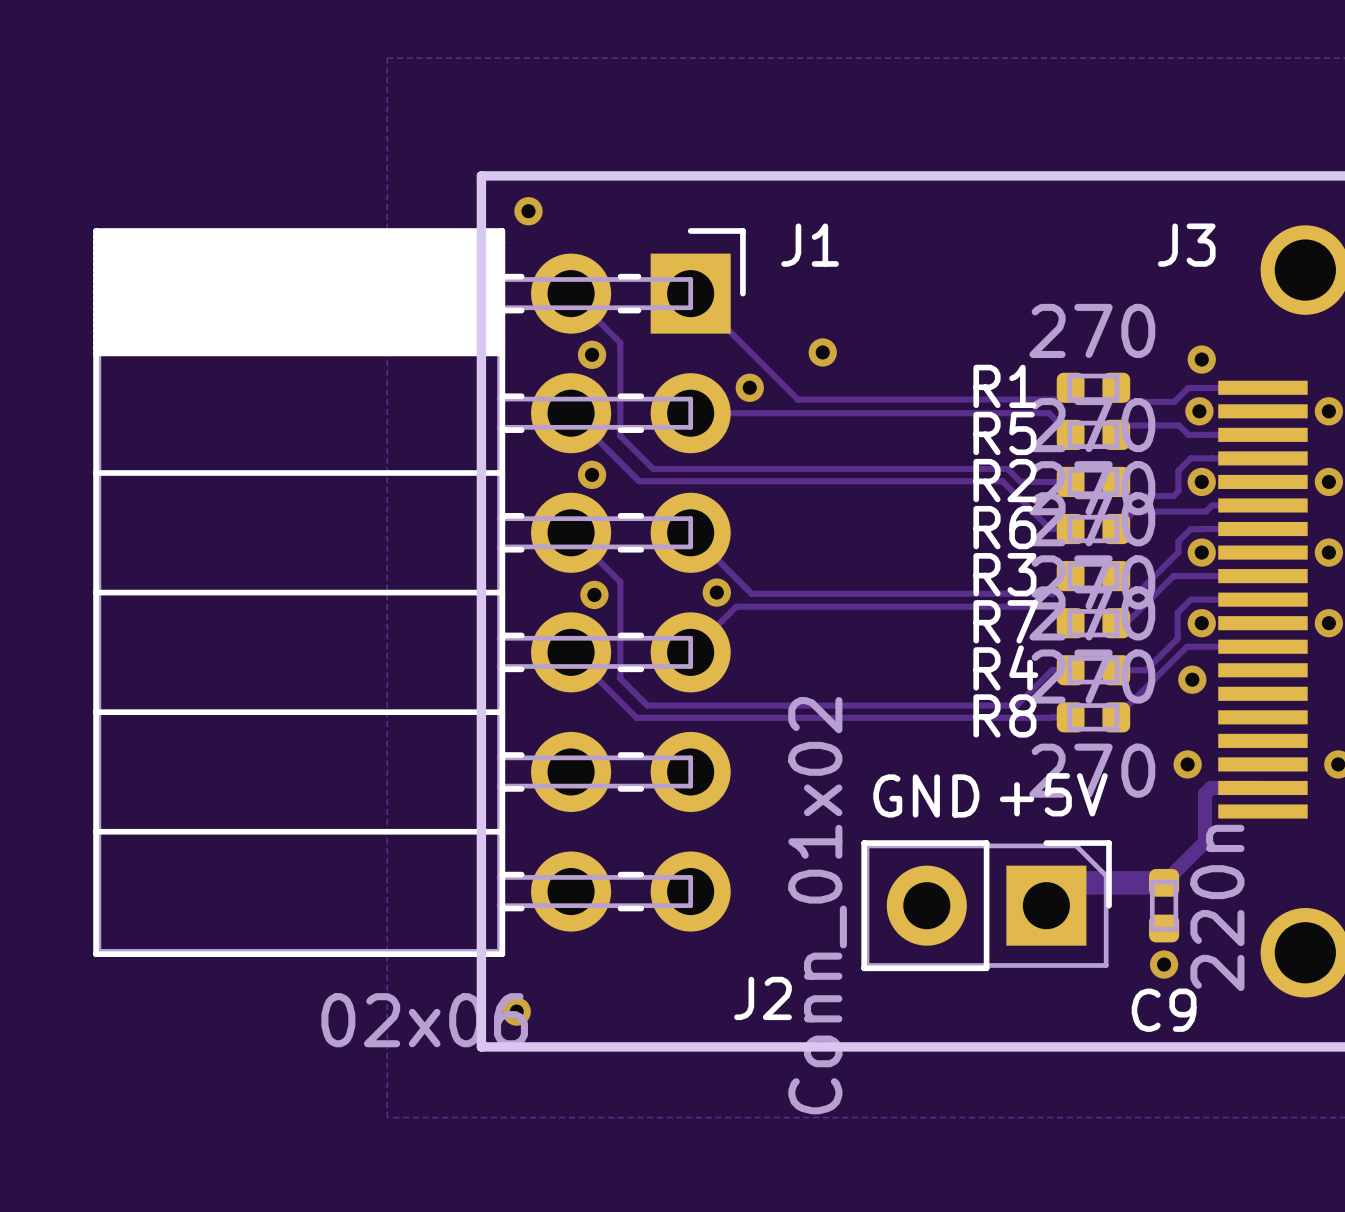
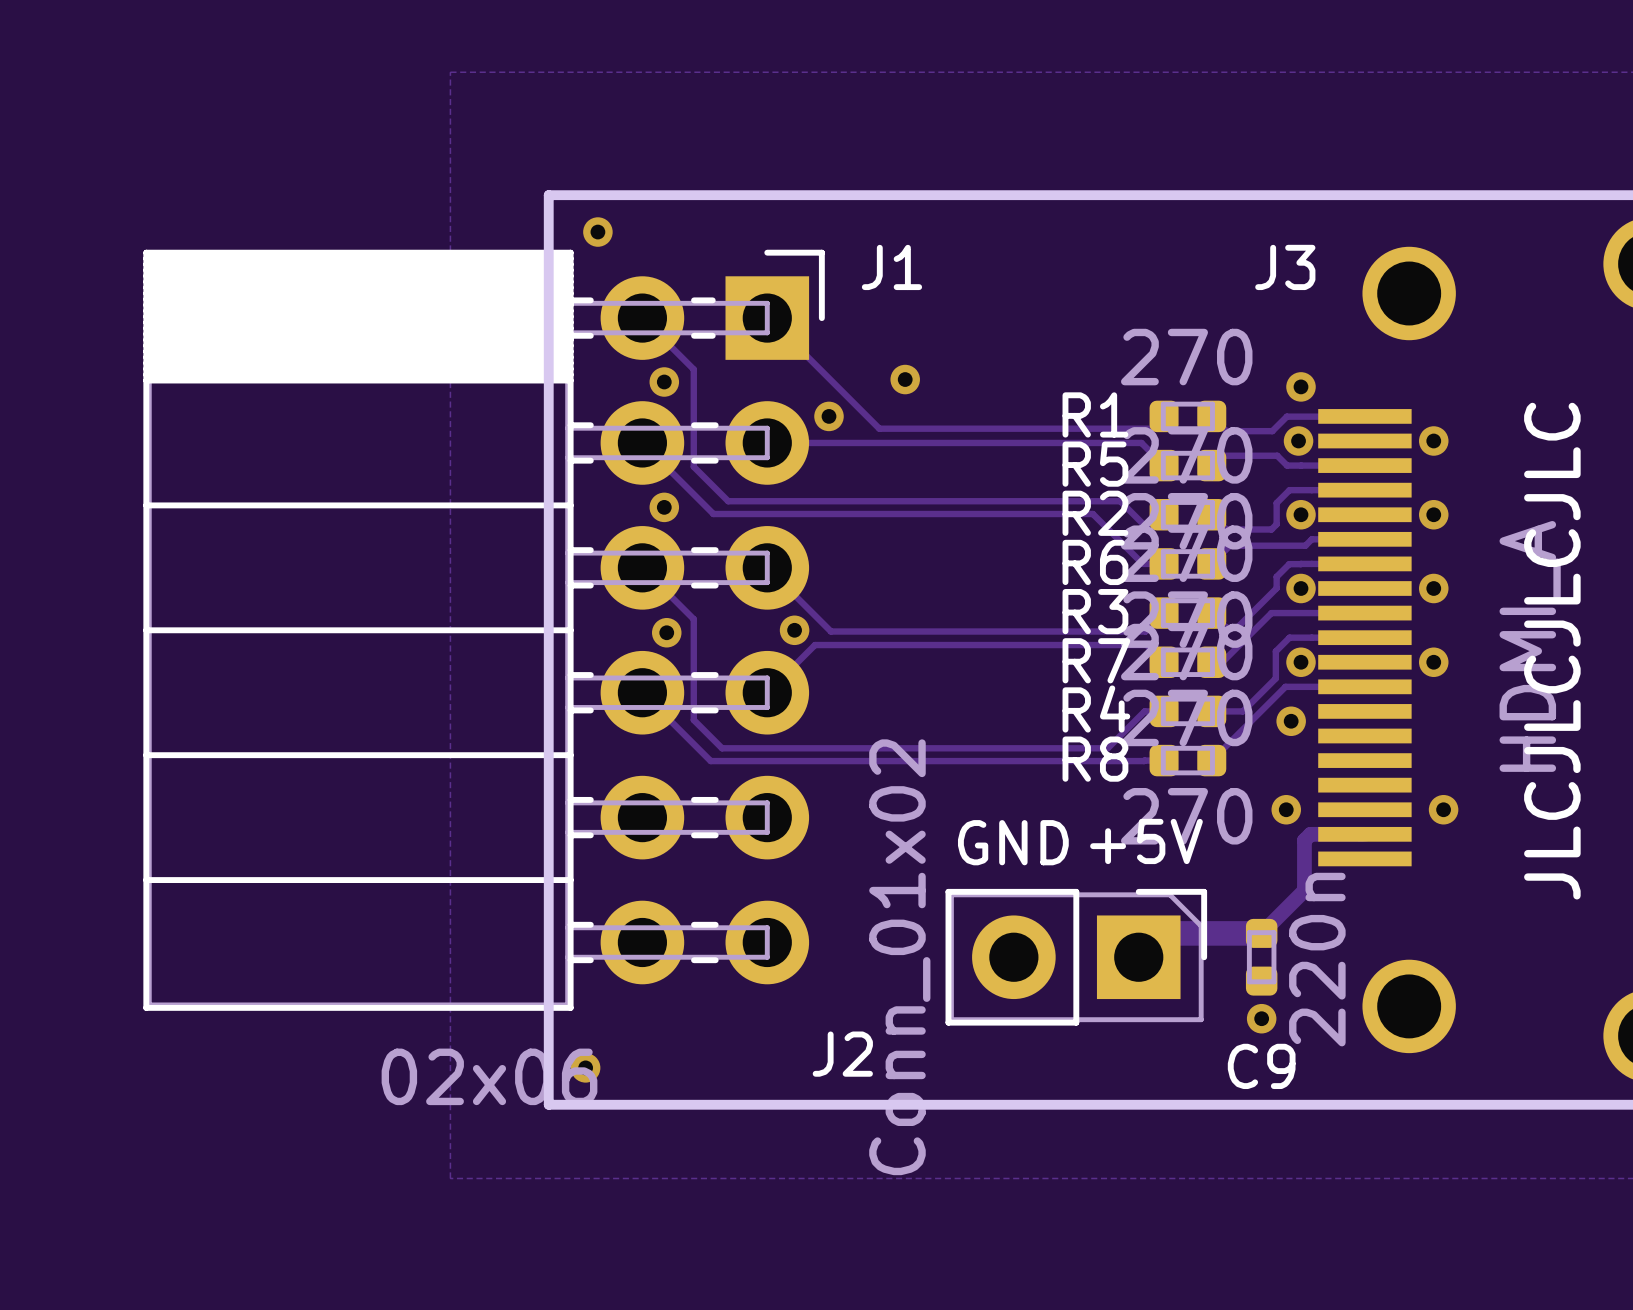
track: (1007, 468) (1020, 481) (1070, 481) -> (1098, 501) (1120, 501) (1143, 524) (1154, 524) (1164, 514)

